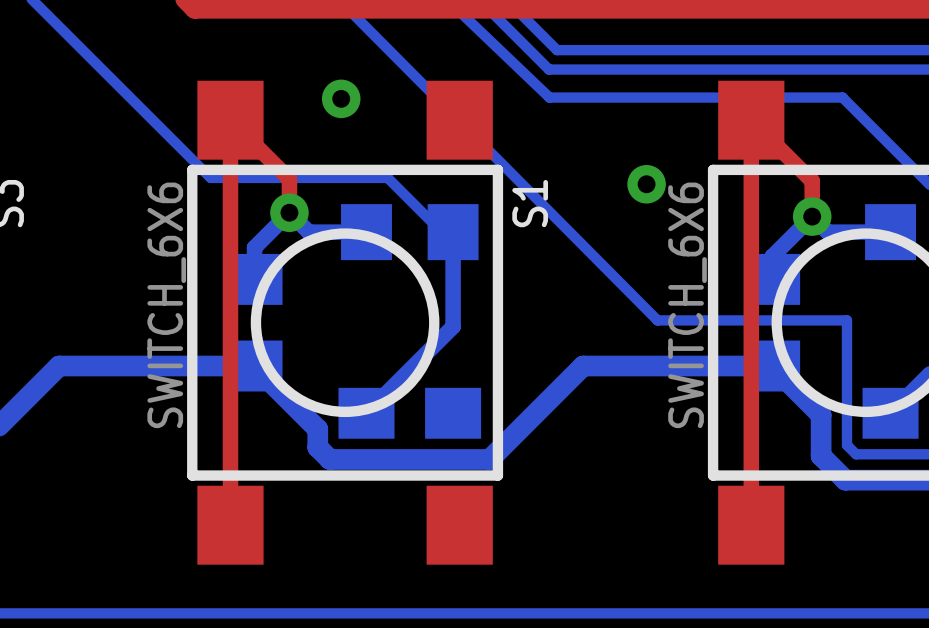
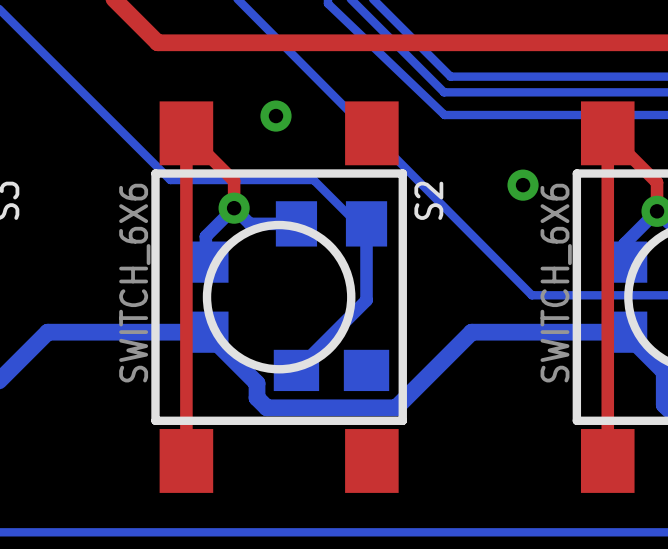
S1 name: S1 (530, 203) -> S2 (428, 200)

